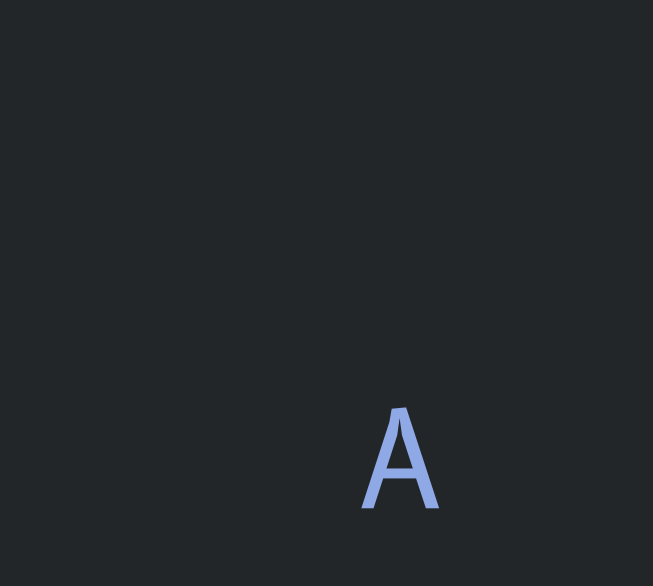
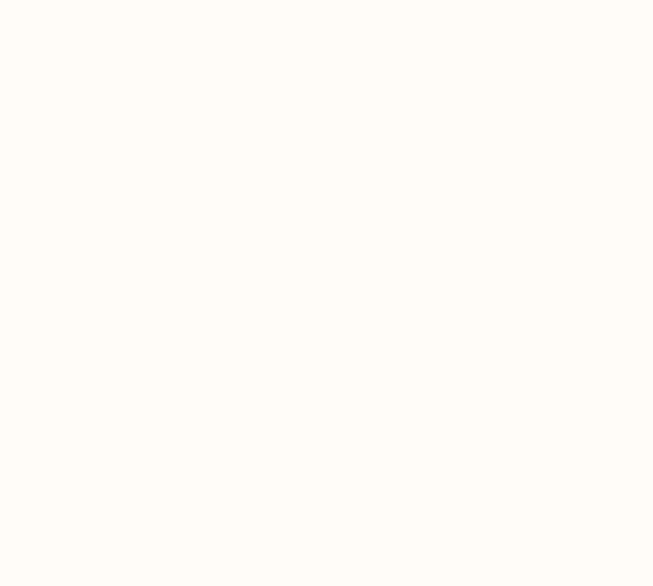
text: A (400, 457) -> none

